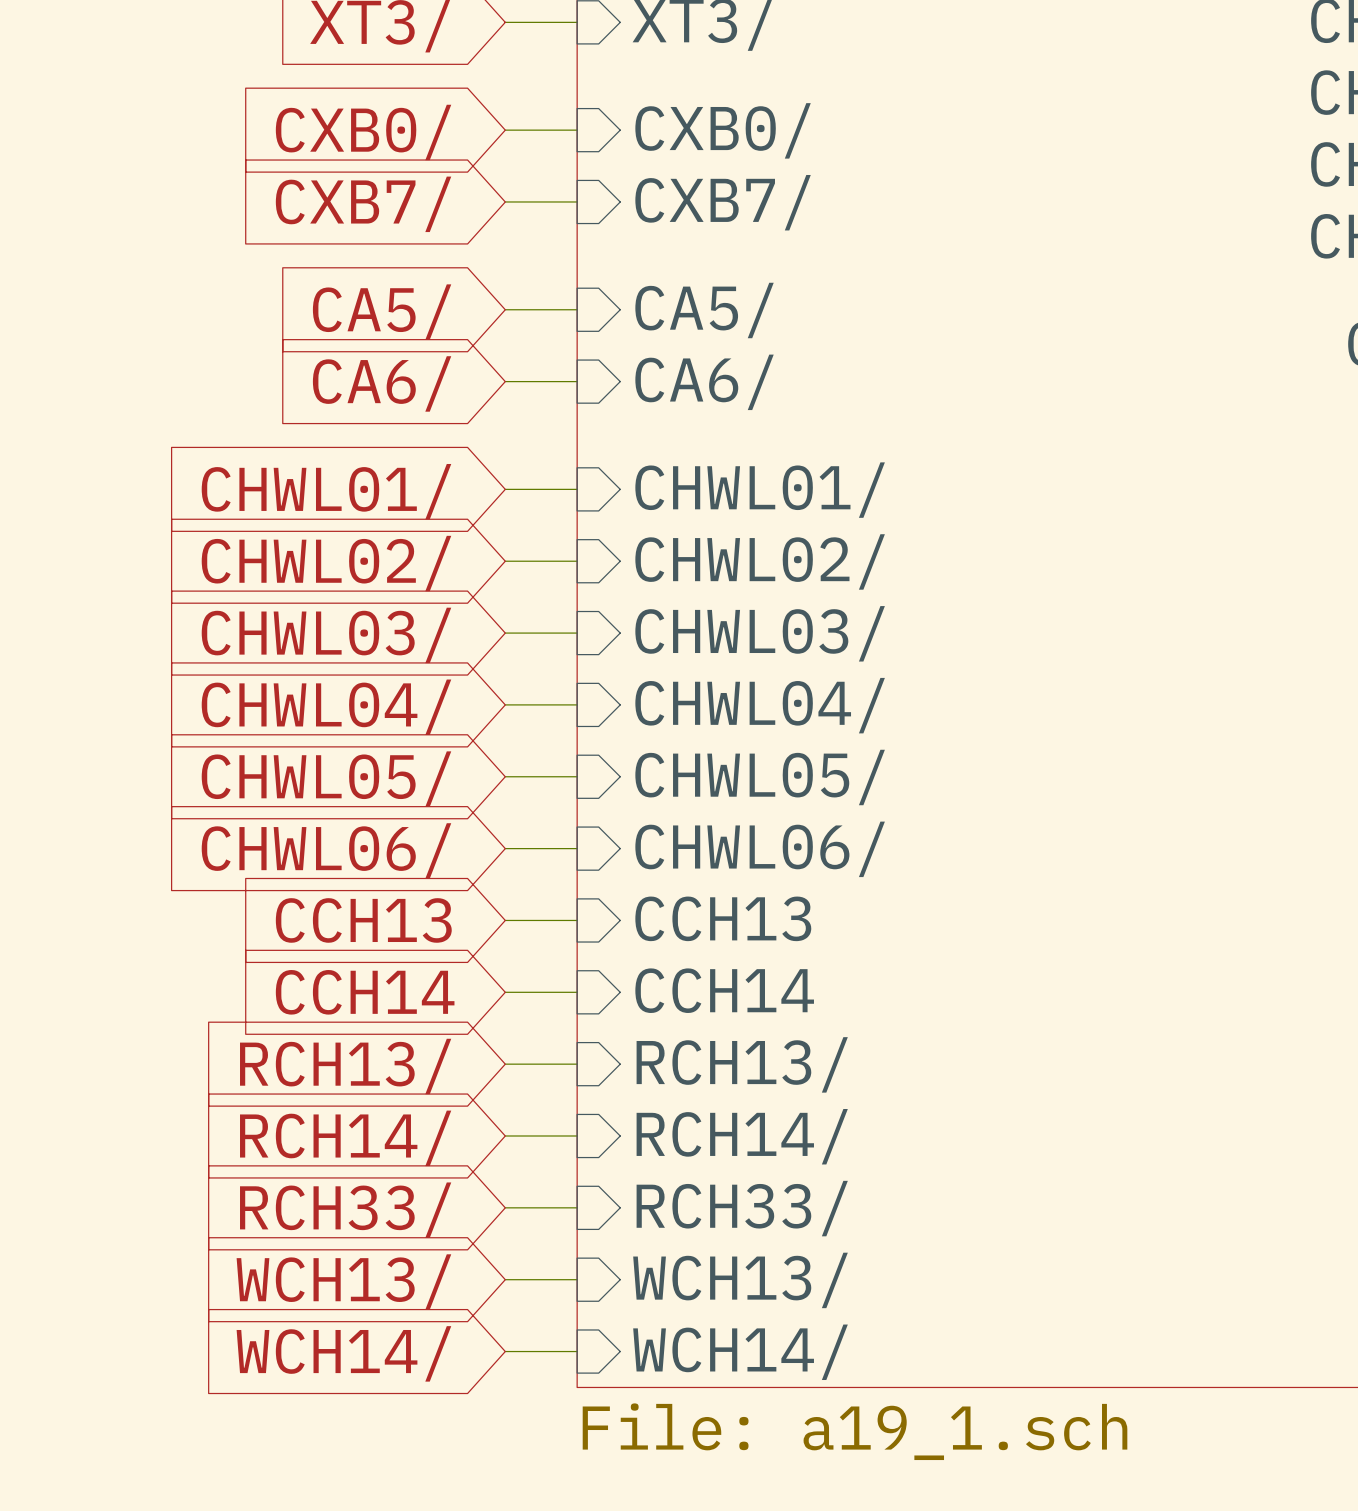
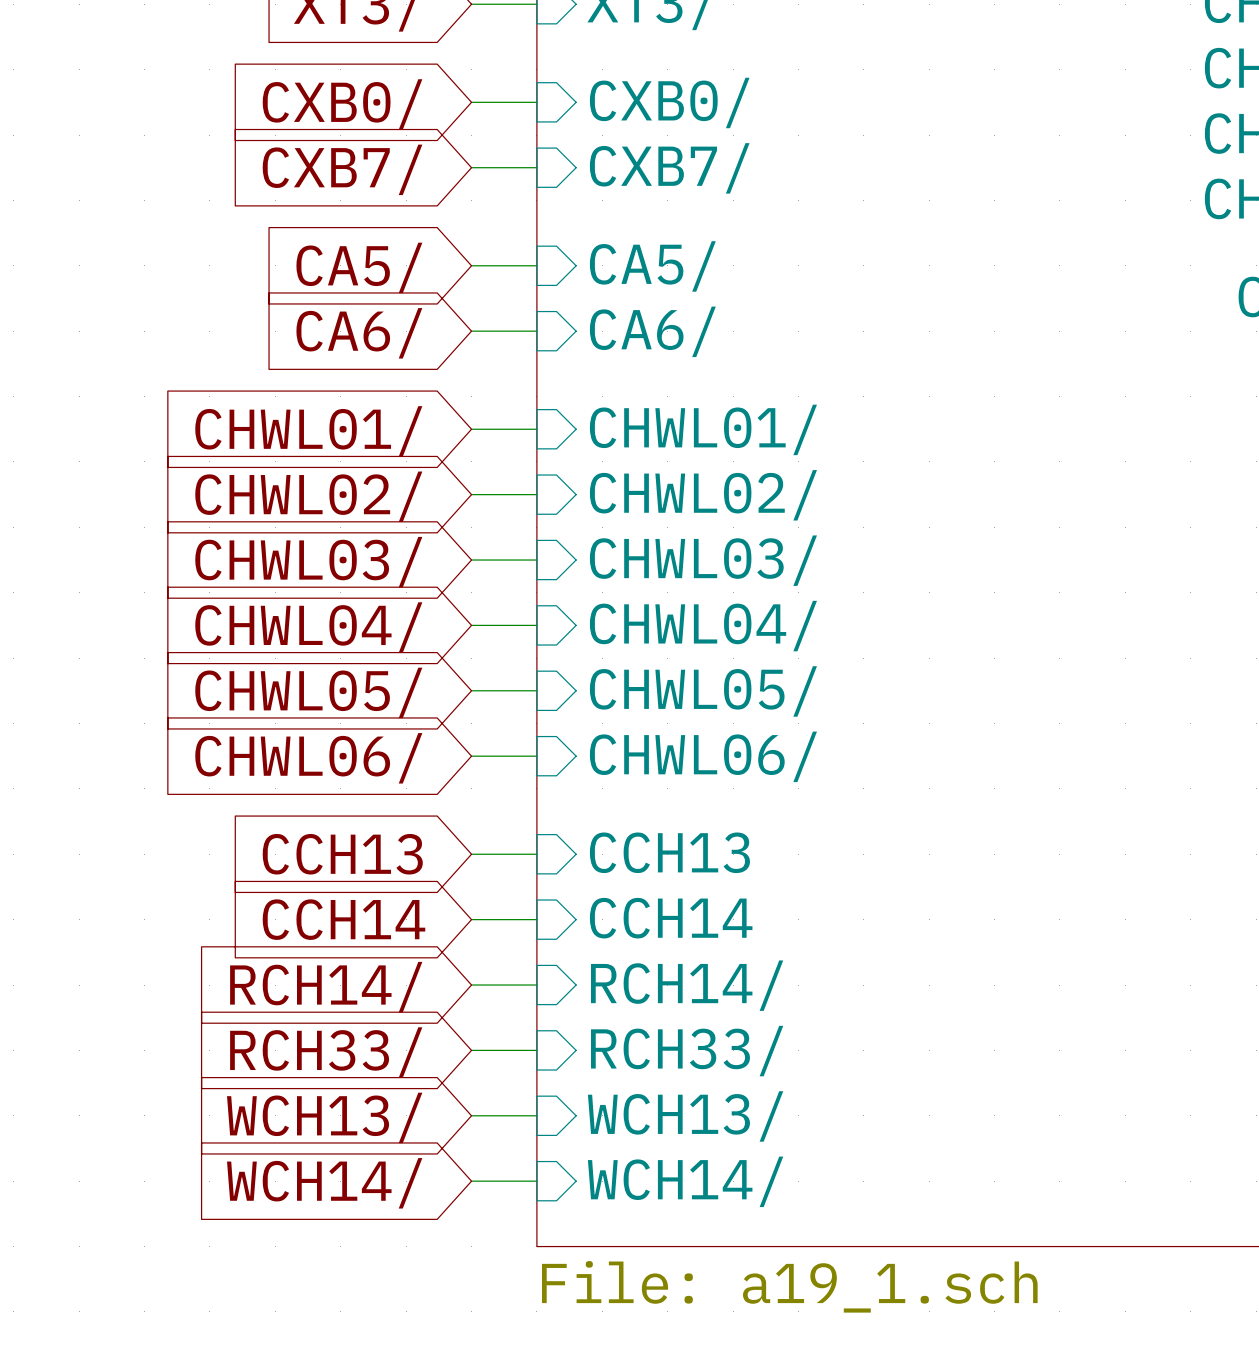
sheet pin position: CCH13 (723, 918) -> CCH13 (669, 852)
global label position: CCH13 (363, 920) -> CCH13 (342, 854)
wire: (505, 920) (577, 920) -> (471, 854) (536, 854)
sheet pin position: CCH14 (724, 990) -> CCH14 (671, 918)
global label position: CCH14 (365, 992) -> CCH14 (343, 919)
wire: (505, 992) (577, 992) -> none
wire: (505, 1064) (577, 1064) -> (471, 919) (536, 919)
sheet pin: RCH13/ (742, 1064) -> none
global label: RCH13/ (345, 1066) -> none
wire: (505, 1136) (577, 1136) -> (471, 985) (536, 985)
sheet pin position: RCH14/ (742, 1136) -> RCH14/ (687, 985)
global label position: RCH14/ (345, 1138) -> RCH14/ (326, 987)
wire: (505, 1207) (577, 1207) -> (471, 1115) (536, 1115)
sheet pin position: RCH33/ (742, 1208) -> RCH33/ (687, 1051)
global label position: RCH33/ (345, 1210) -> RCH33/ (326, 1052)
wire: (505, 1279) (577, 1279) -> (471, 1050) (536, 1050)
sheet pin position: WCH13/ (740, 1280) -> WCH13/ (685, 1116)
global label position: WCH13/ (343, 1282) -> WCH13/ (324, 1117)
wire: (505, 1351) (577, 1351) -> (471, 1181) (536, 1181)
sheet pin position: WCH14/ (740, 1352) -> WCH14/ (685, 1181)
global label position: WCH14/ (343, 1353) -> WCH14/ (324, 1183)

